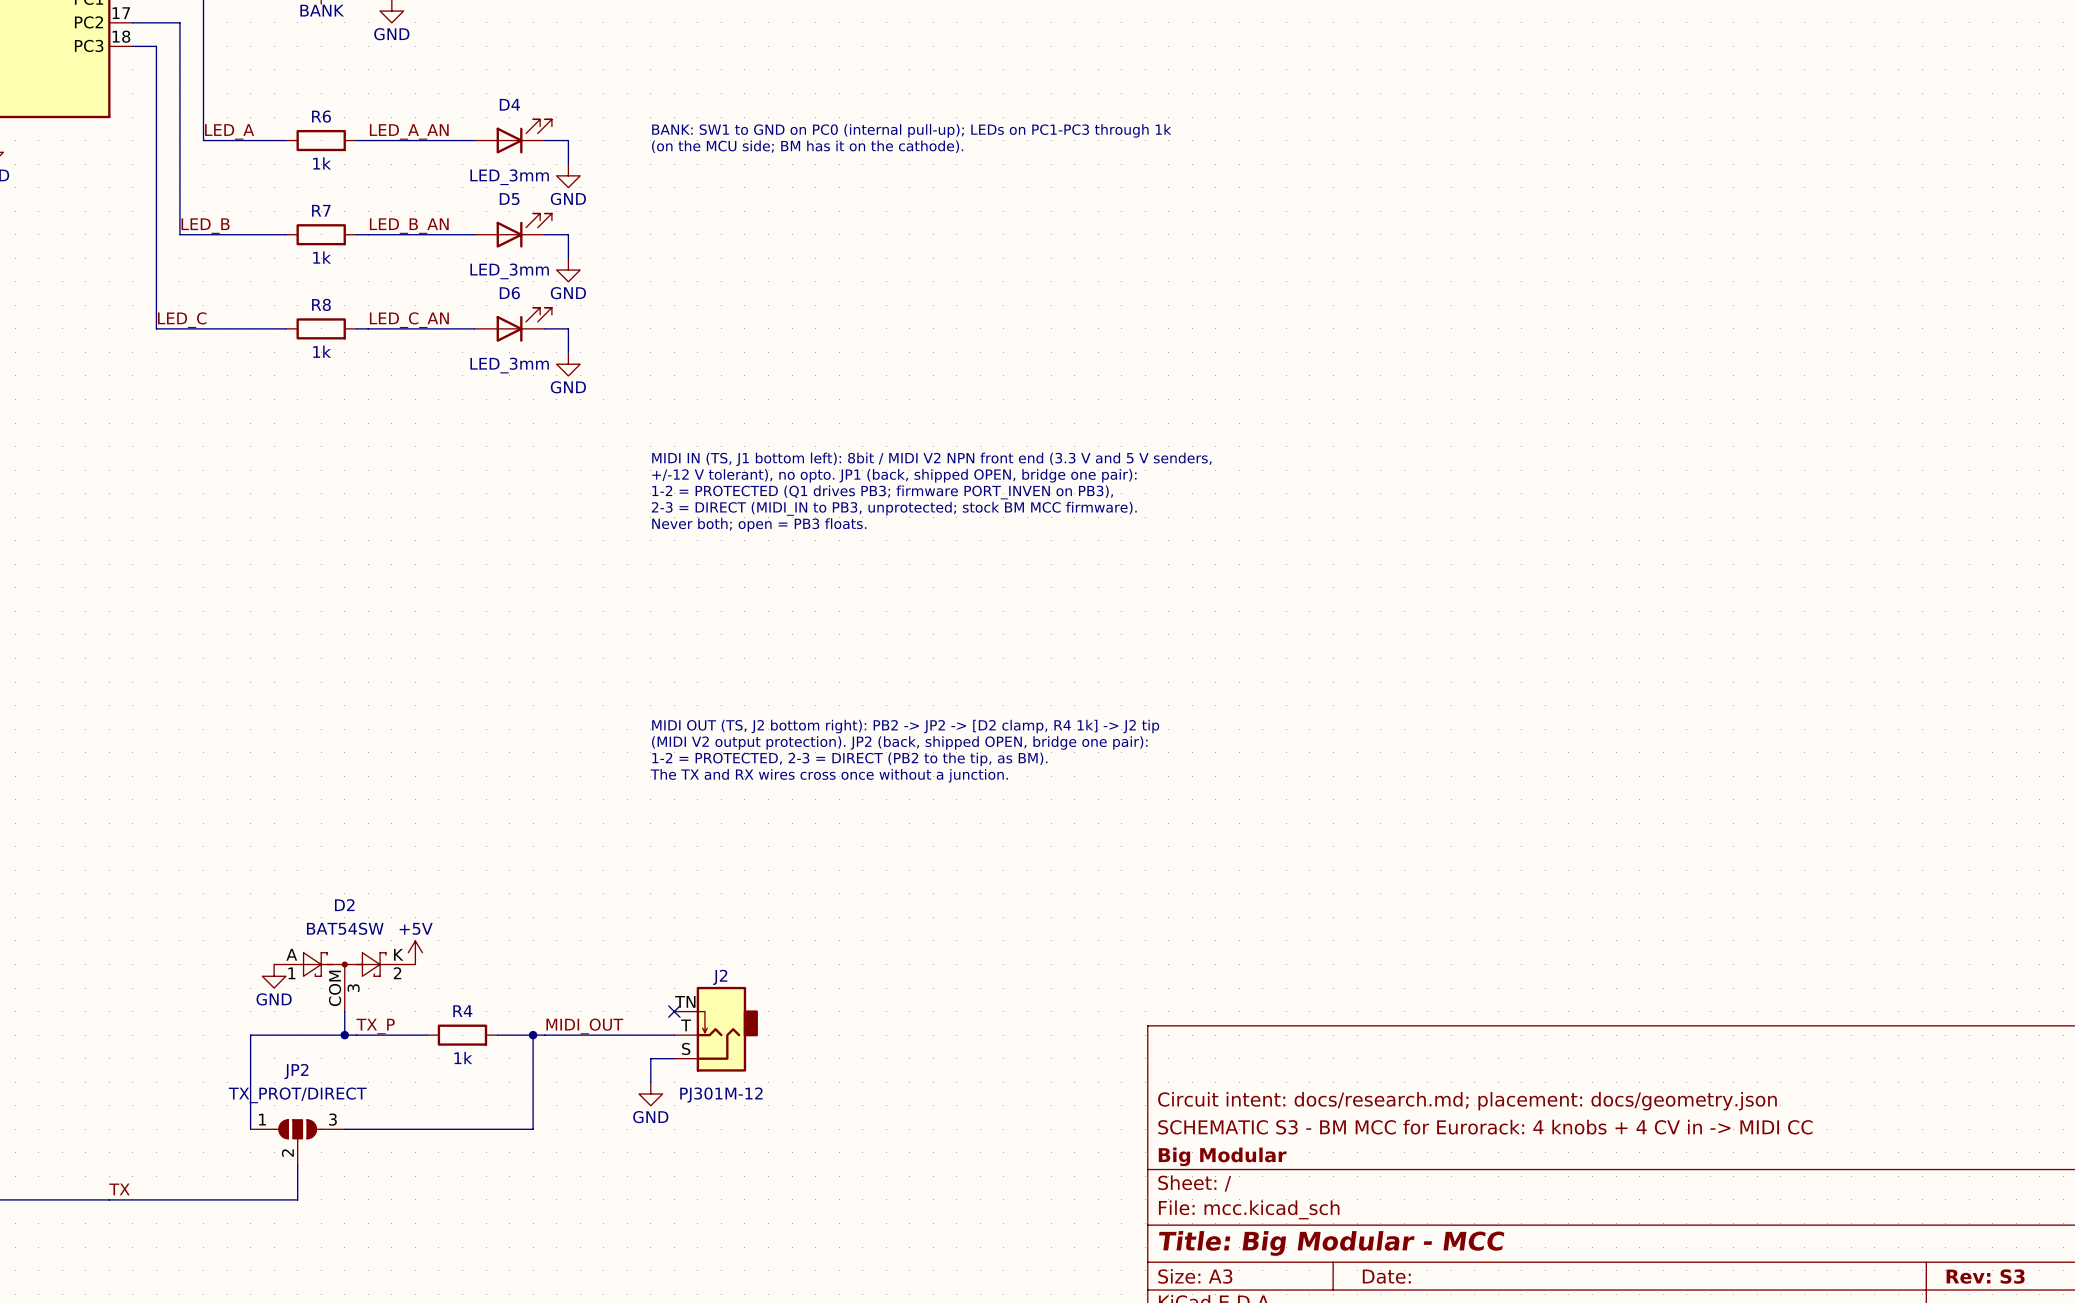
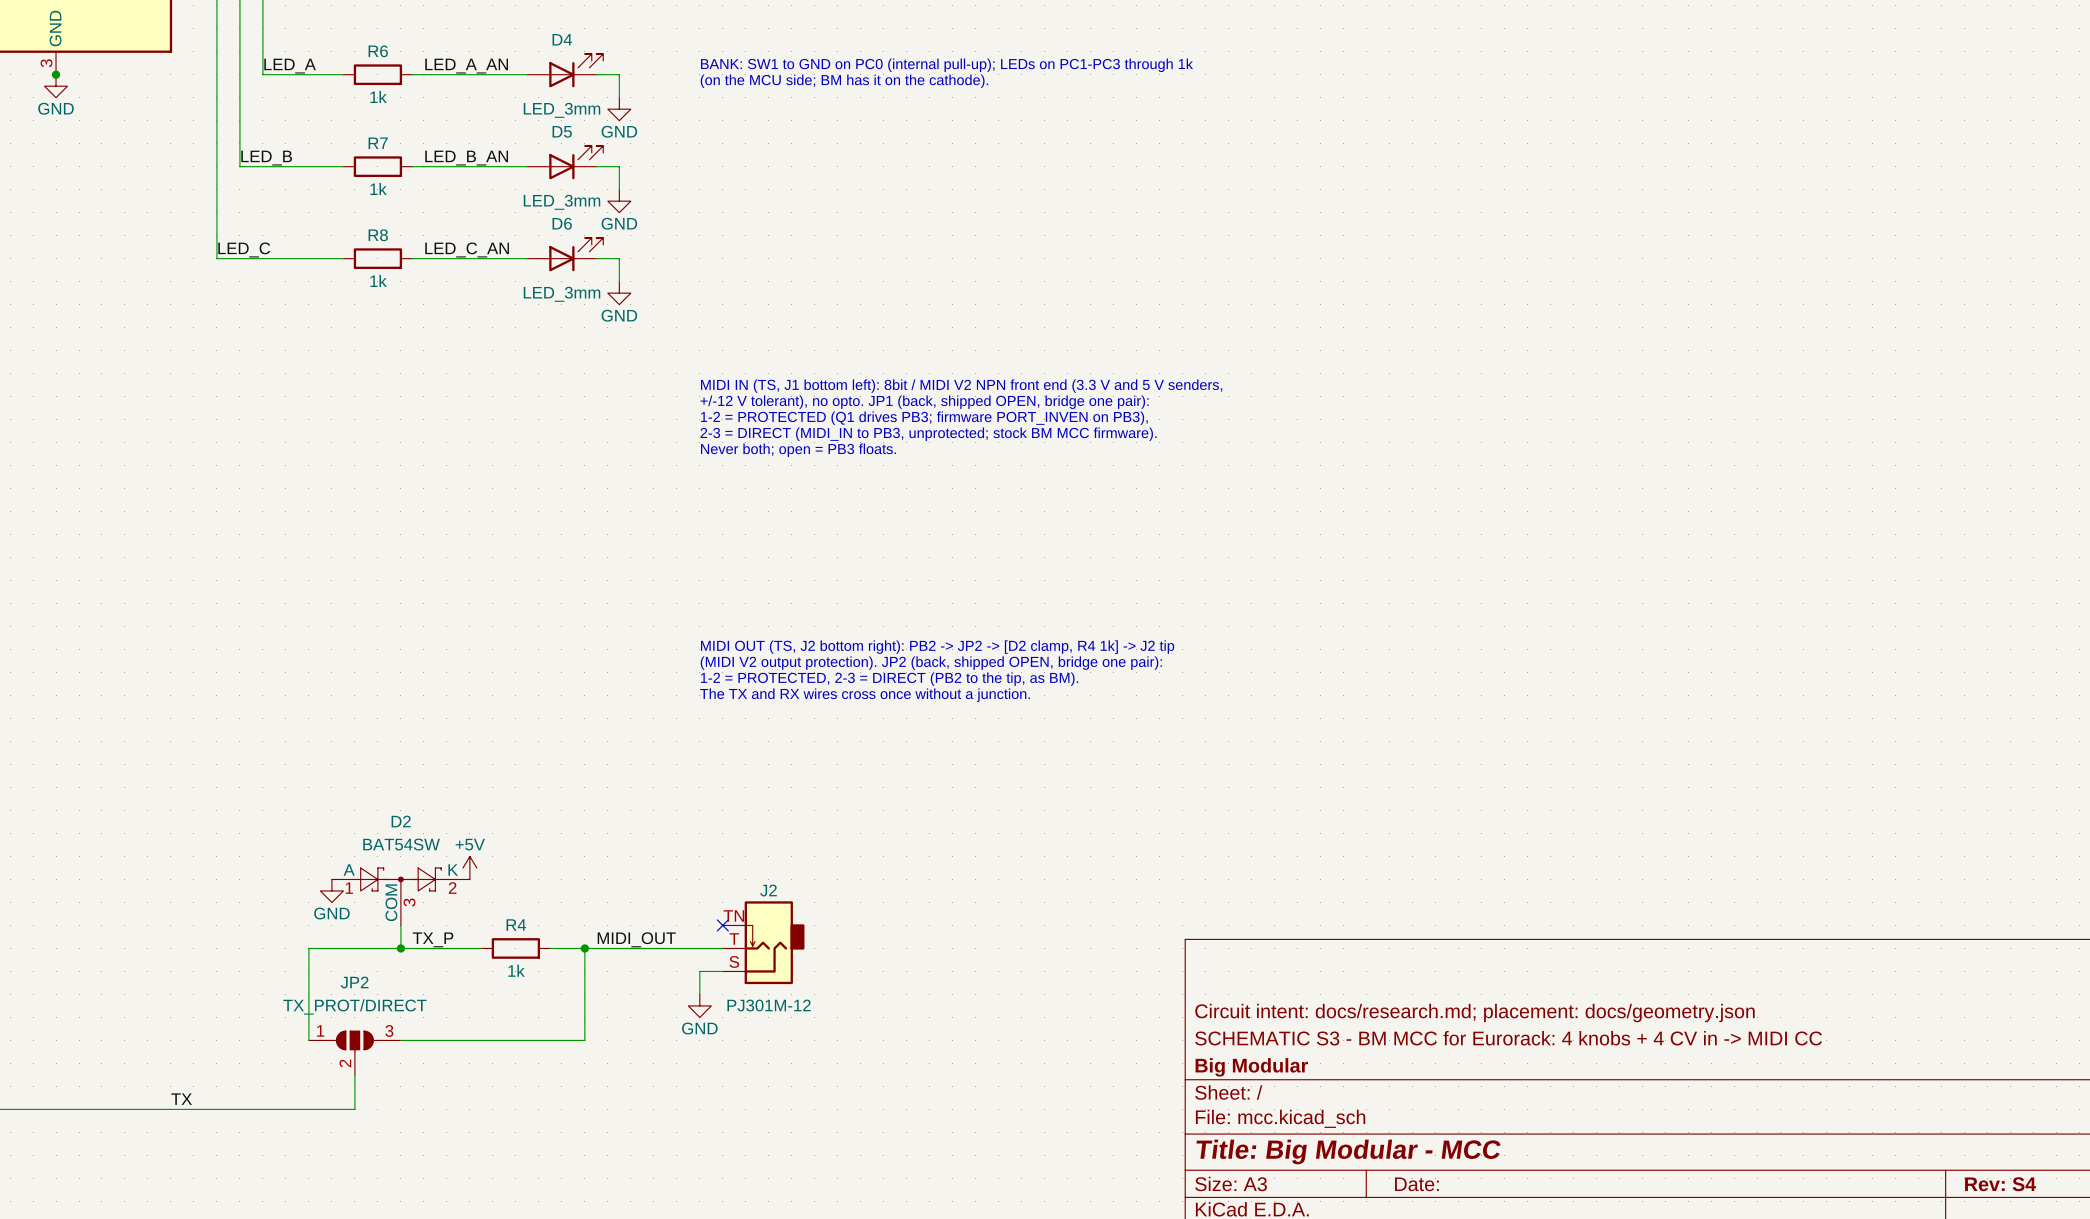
title block: Rev: S3 (1985, 1276) -> Rev: S4 (2000, 1184)

